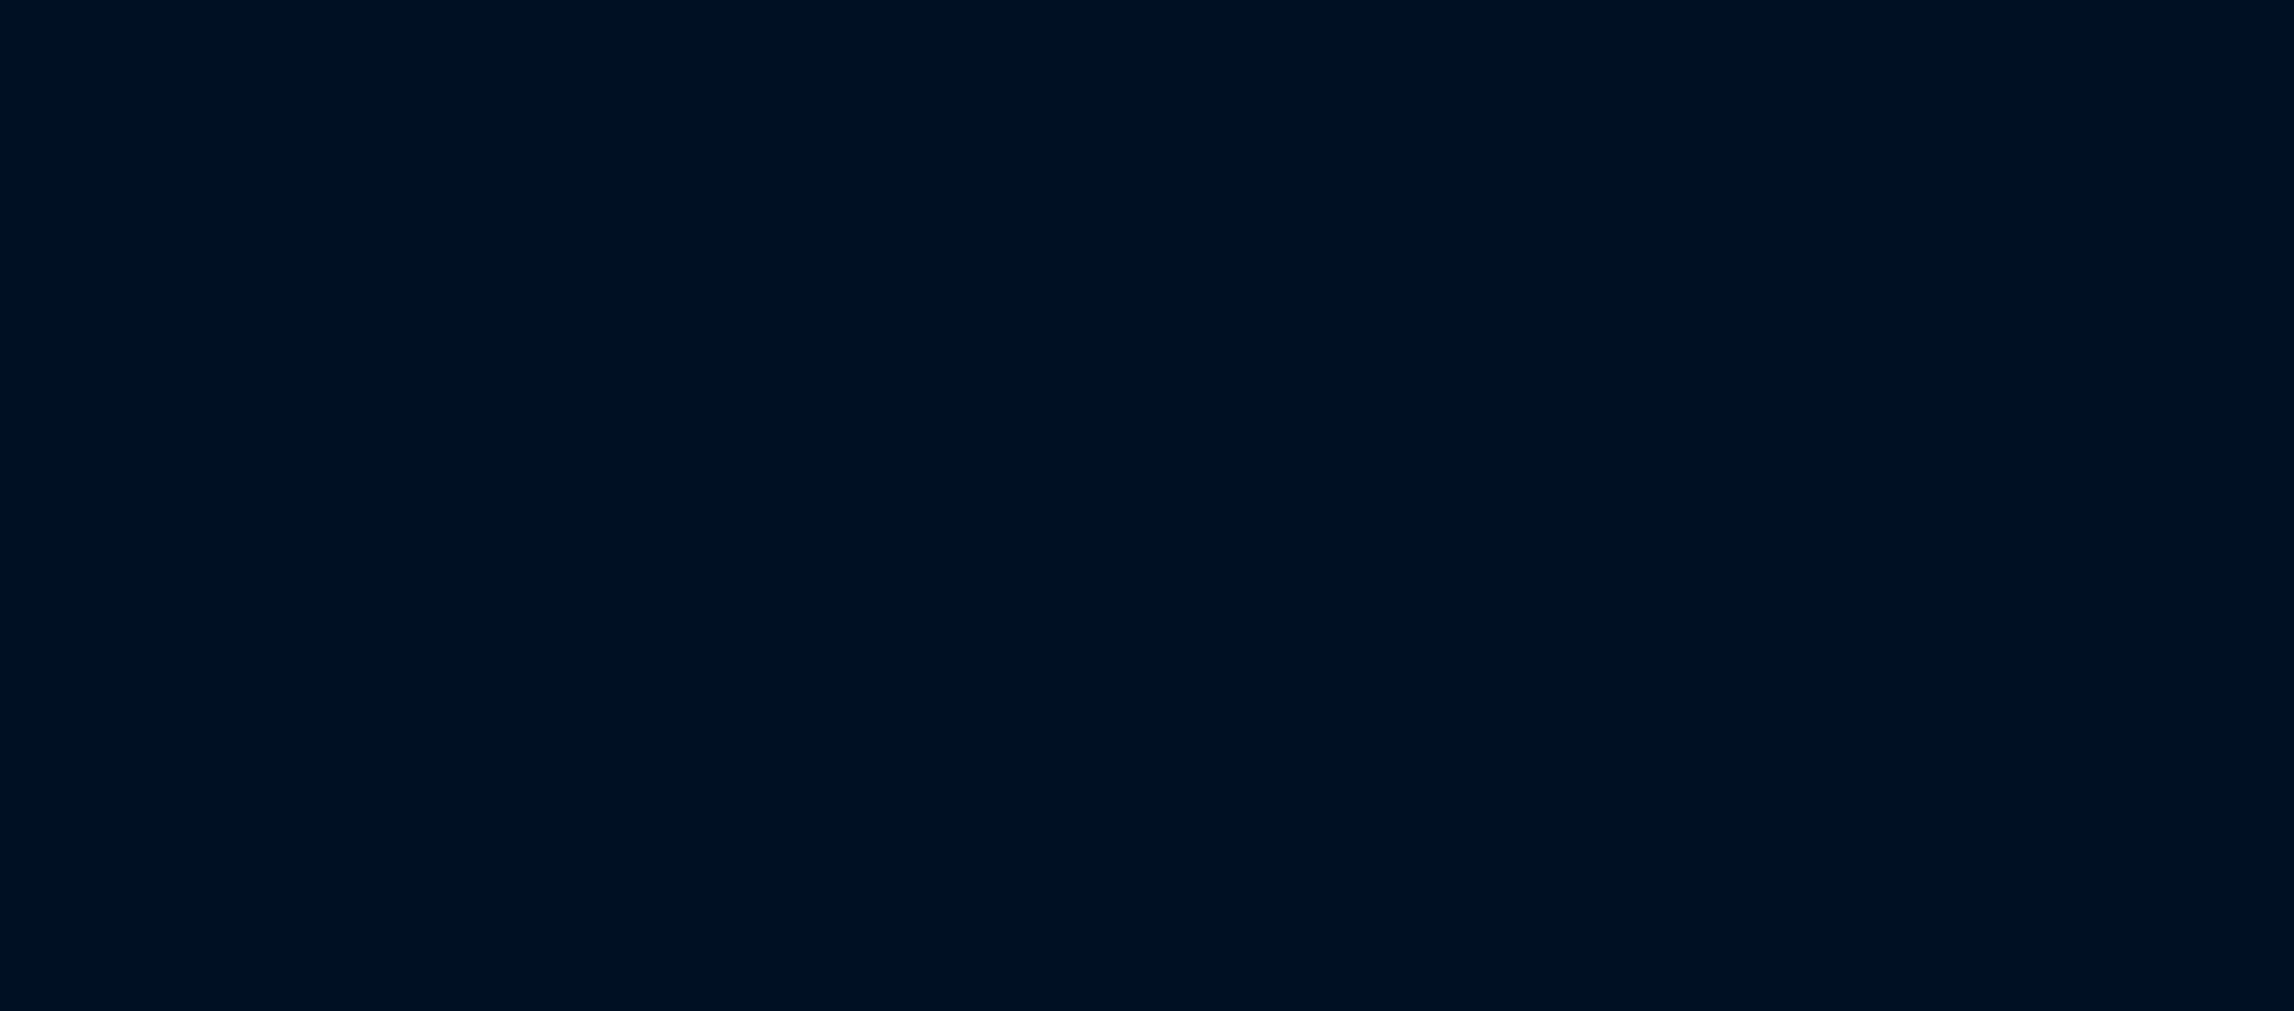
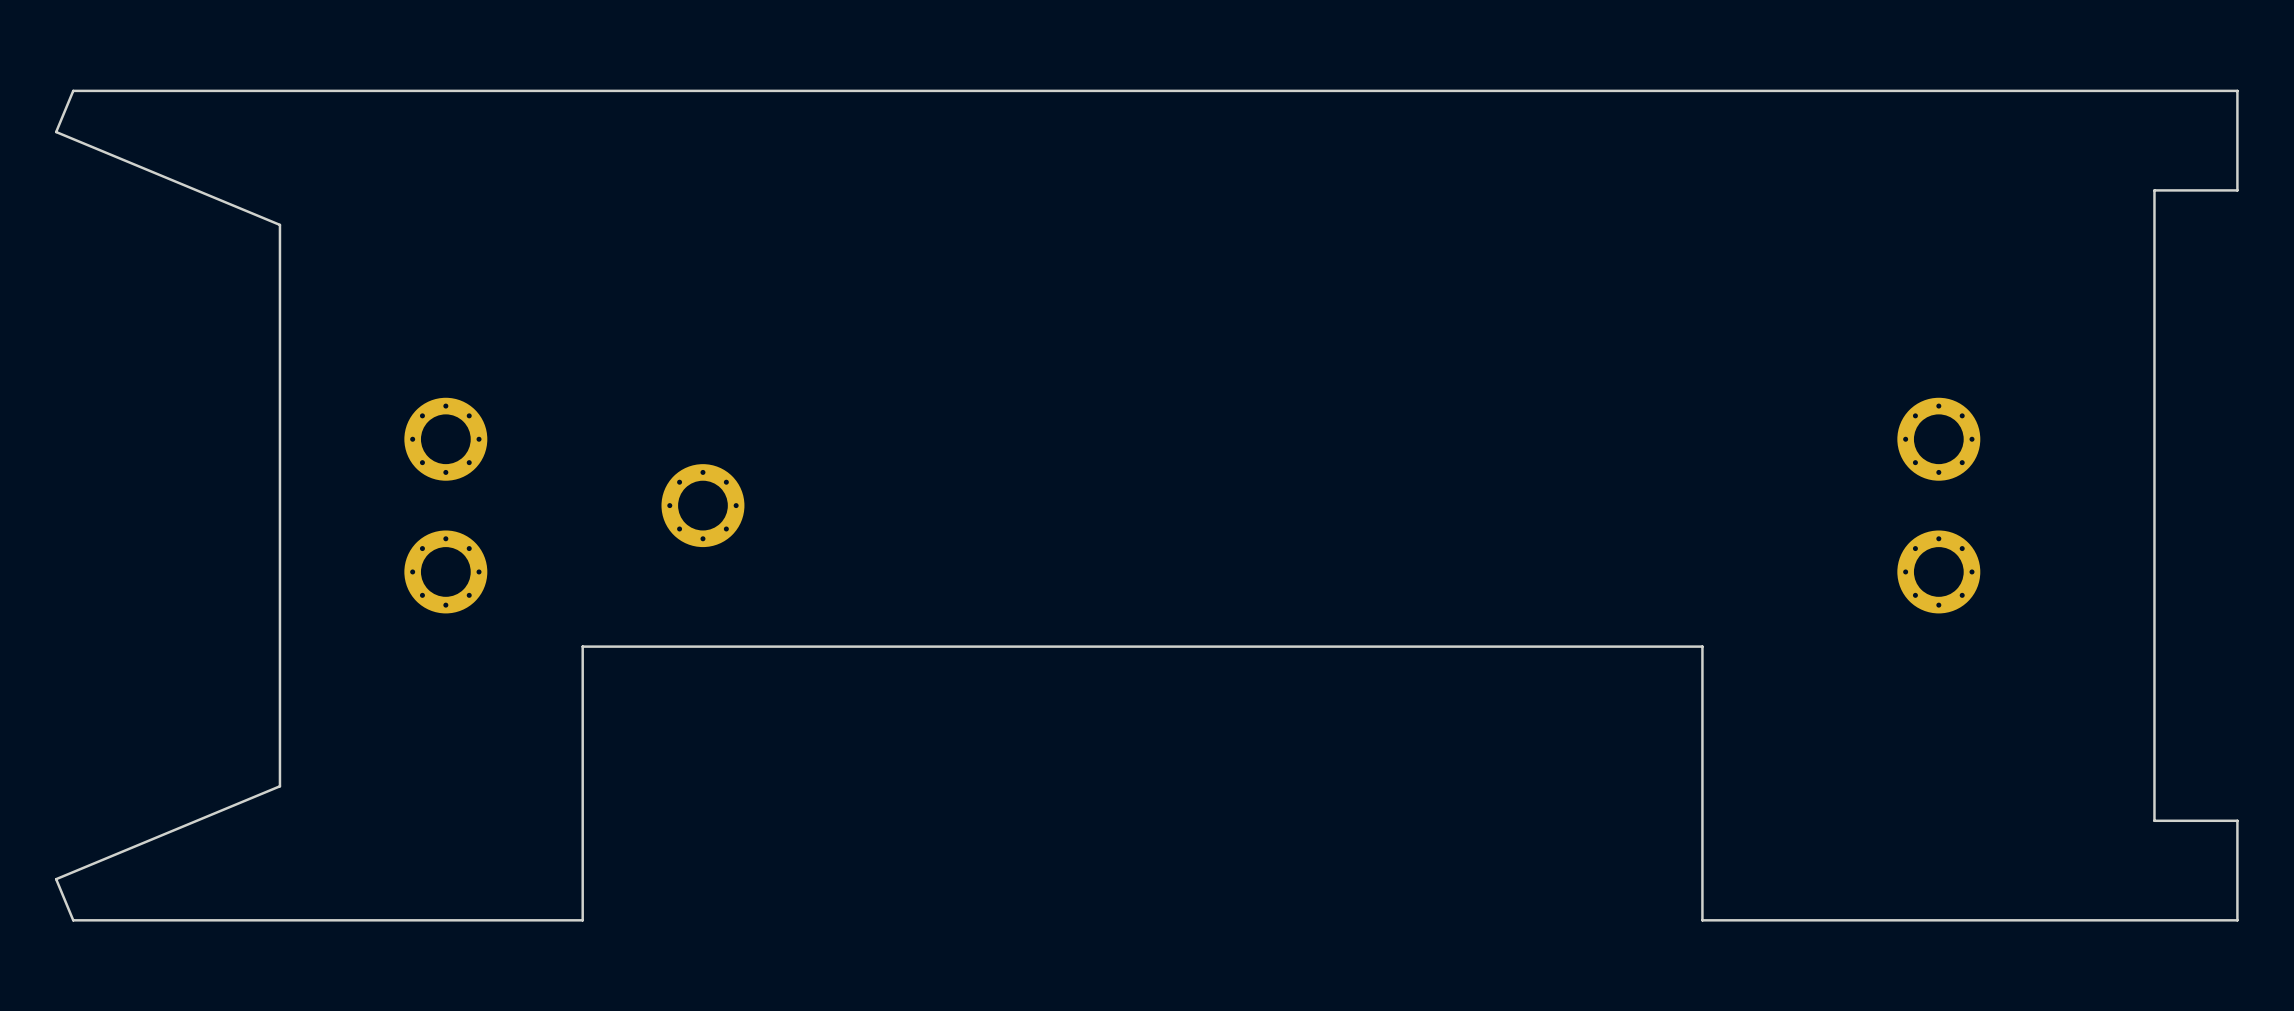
board edge: none -> (2237, 90) (2237, 190) (2154, 190) (2154, 820) (2237, 820) (2237, 920) (1702, 920) (1702, 646) (582, 646) (582, 920) (73, 920) (56, 879) (279, 786) (279, 224) (56, 132) (73, 90) (2237, 90)
part: none -> (445, 439)
part: none -> (1938, 439)
part: none -> (702, 505)
part: none -> (445, 571)
part: none -> (1938, 571)

